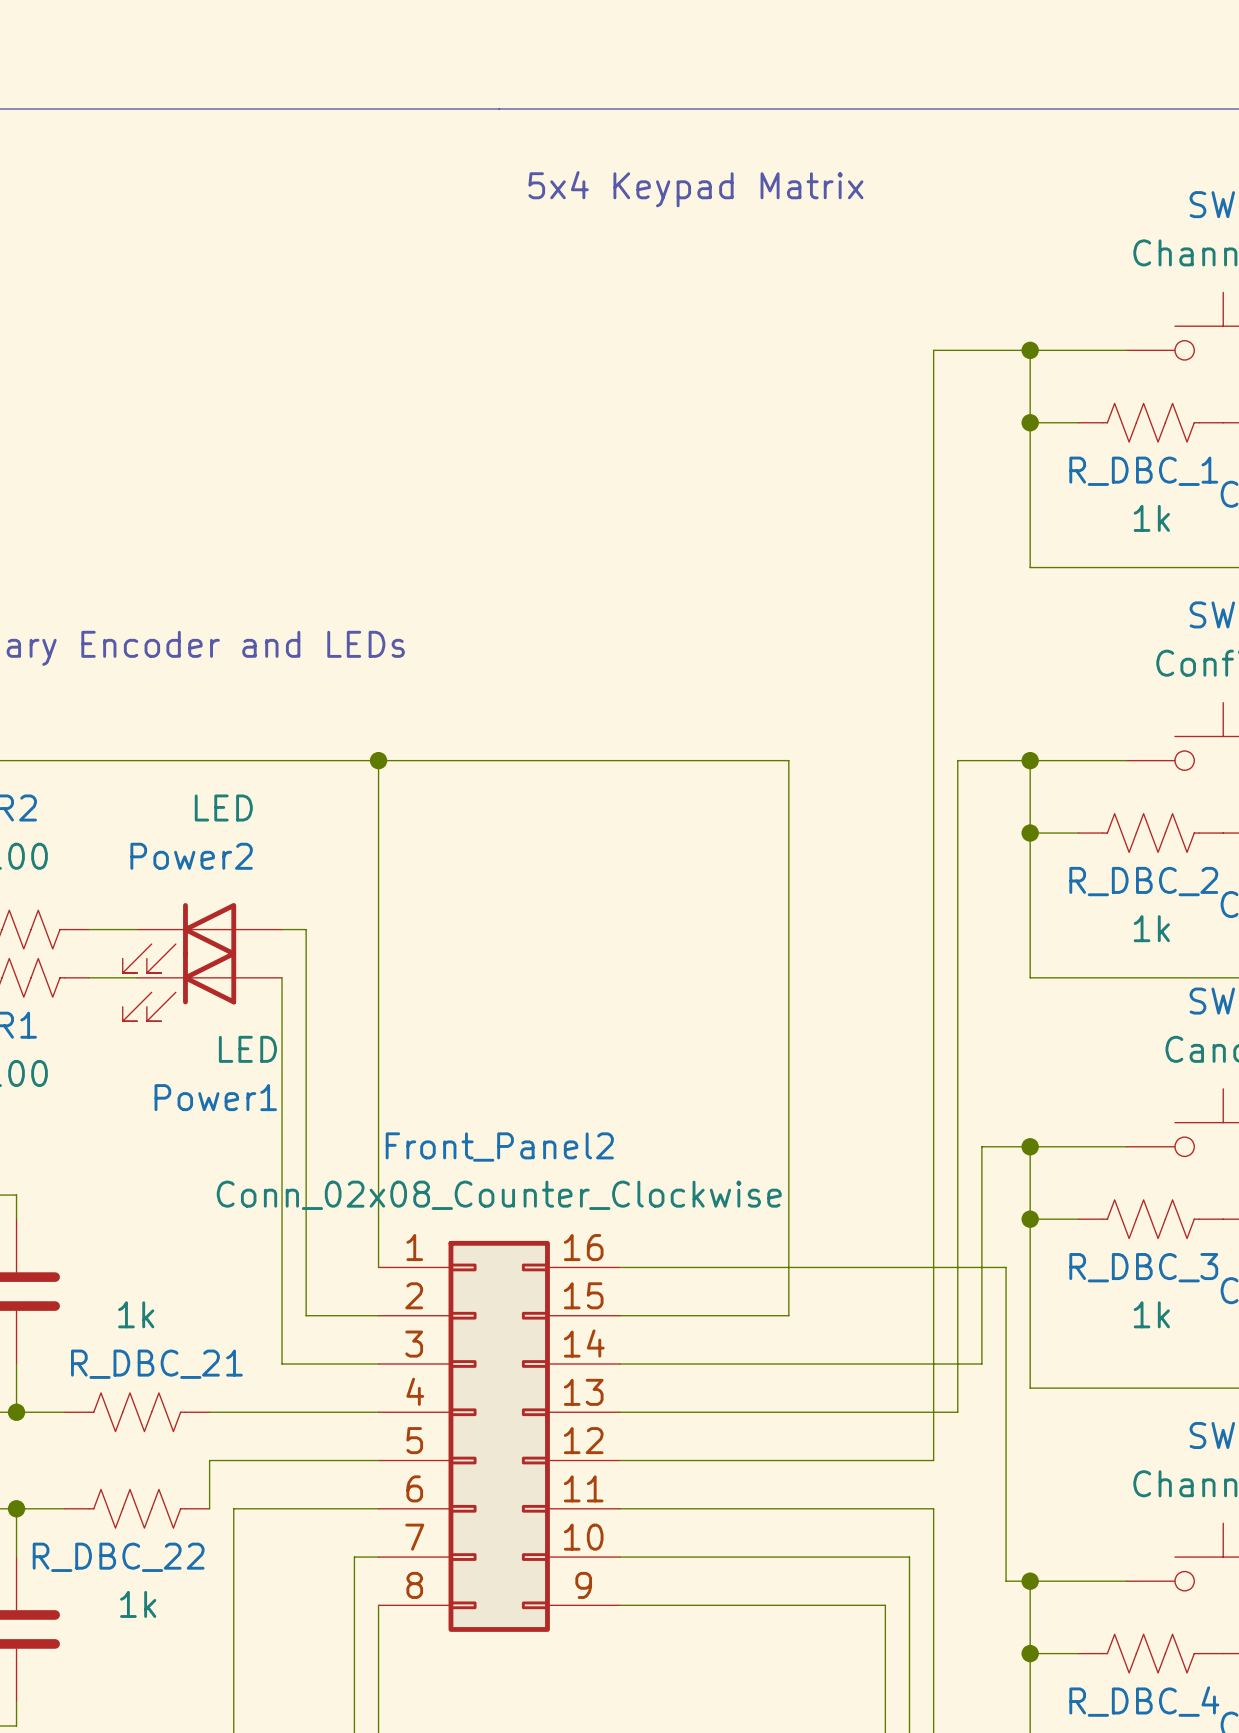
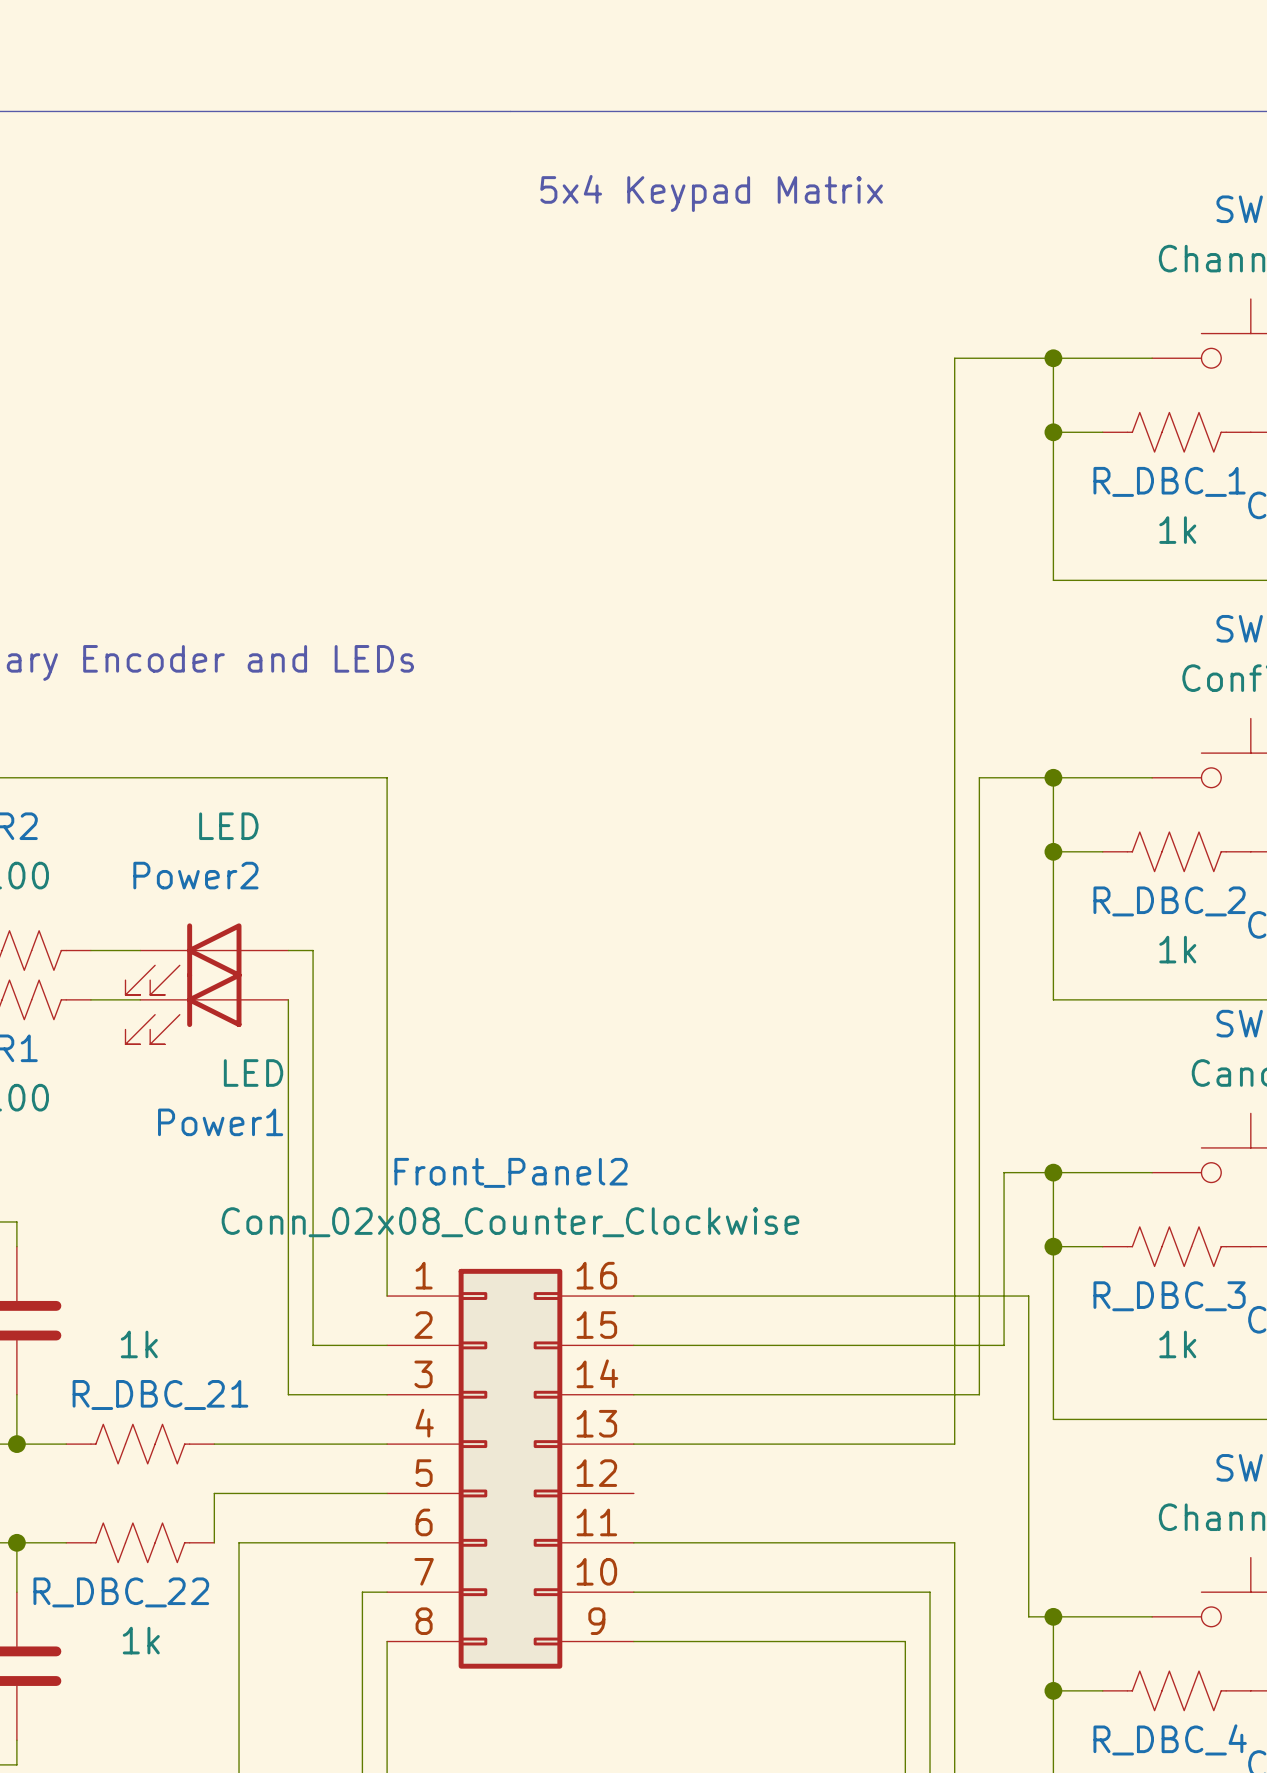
wire: (378, 760) (788, 760) (788, 1315) -> none
junction: (378, 760) -> none
wire: (981, 1315) (981, 1363) (957, 1363) (957, 1412) (933, 1412) (933, 1460) (619, 1460) -> (1004, 1345) (806, 1345)

